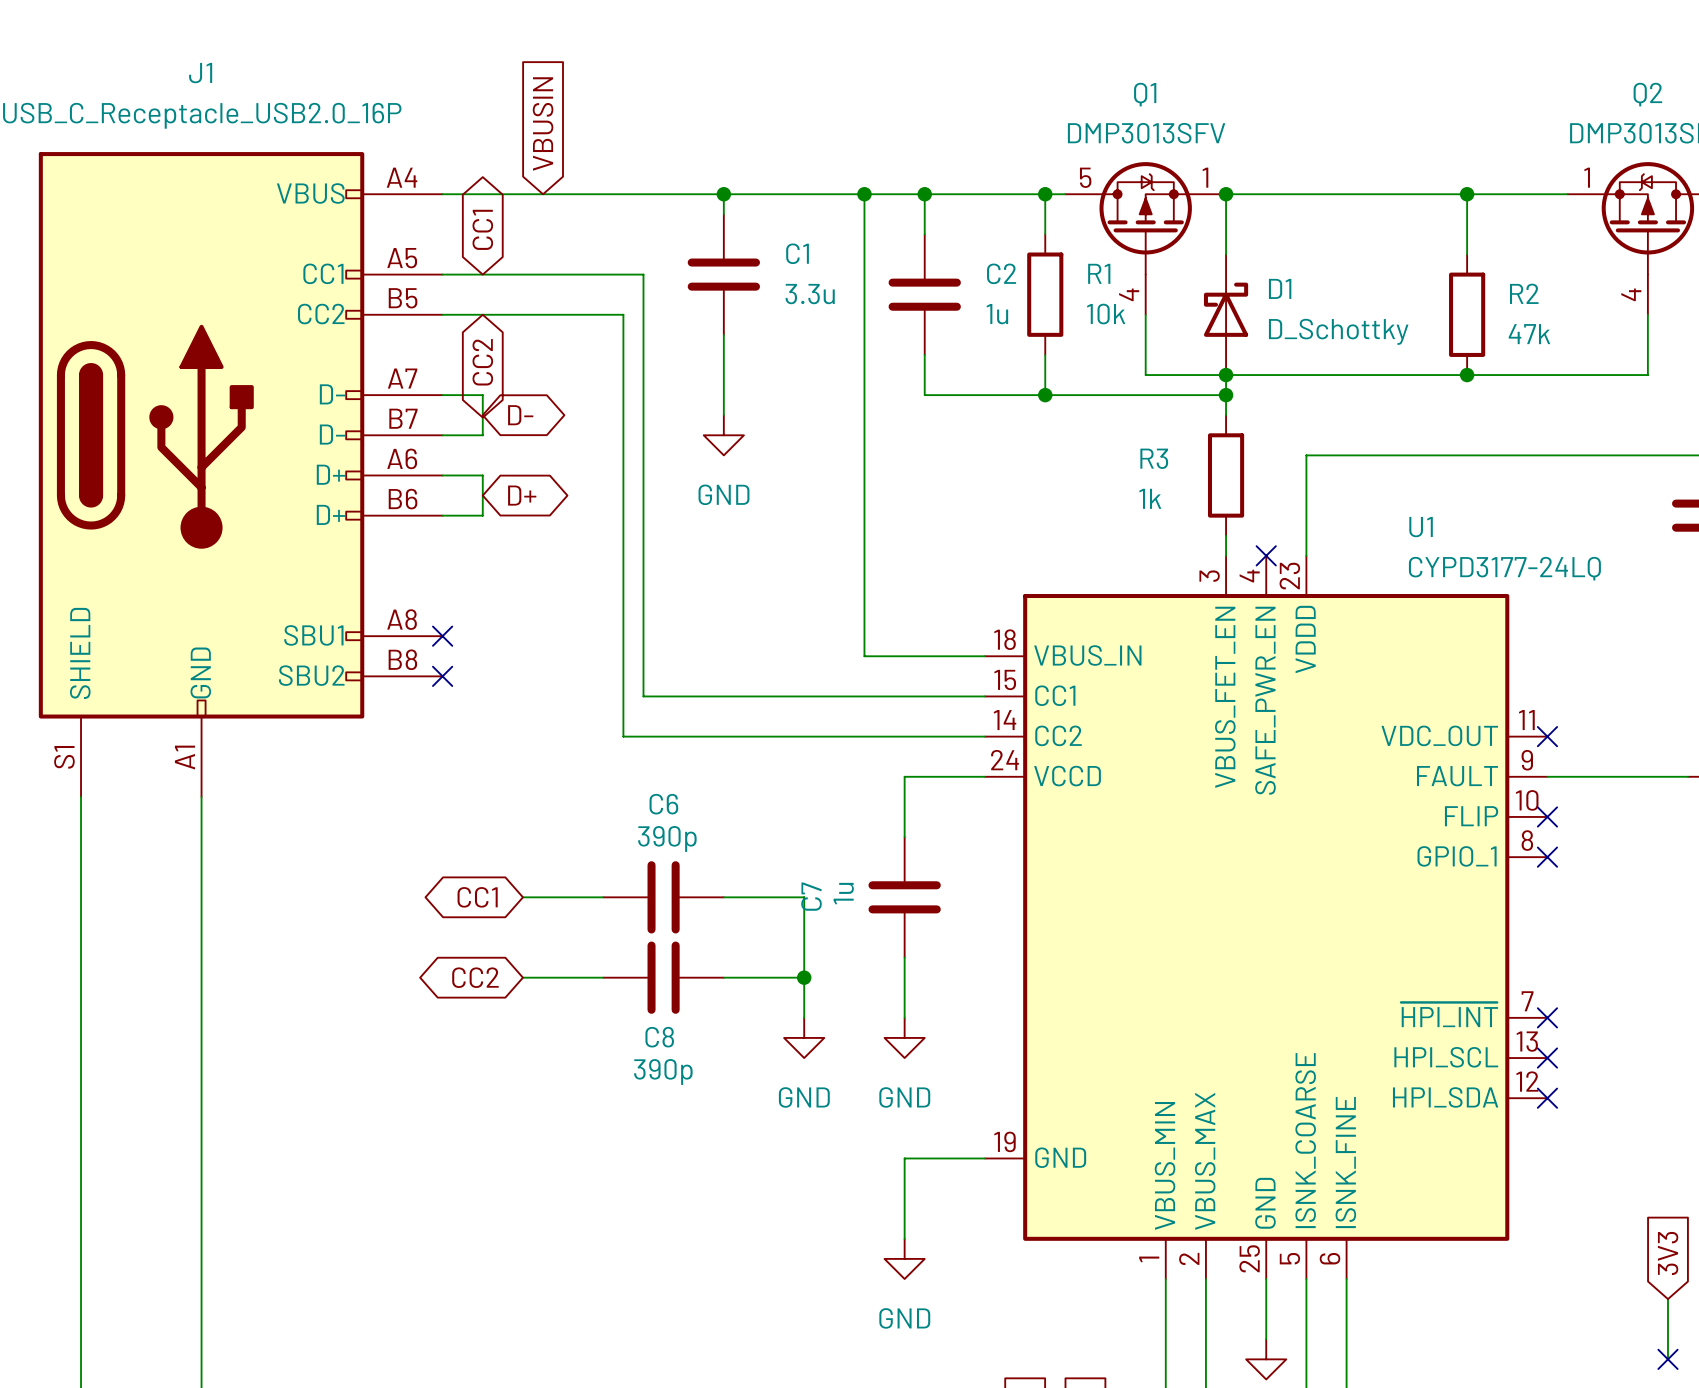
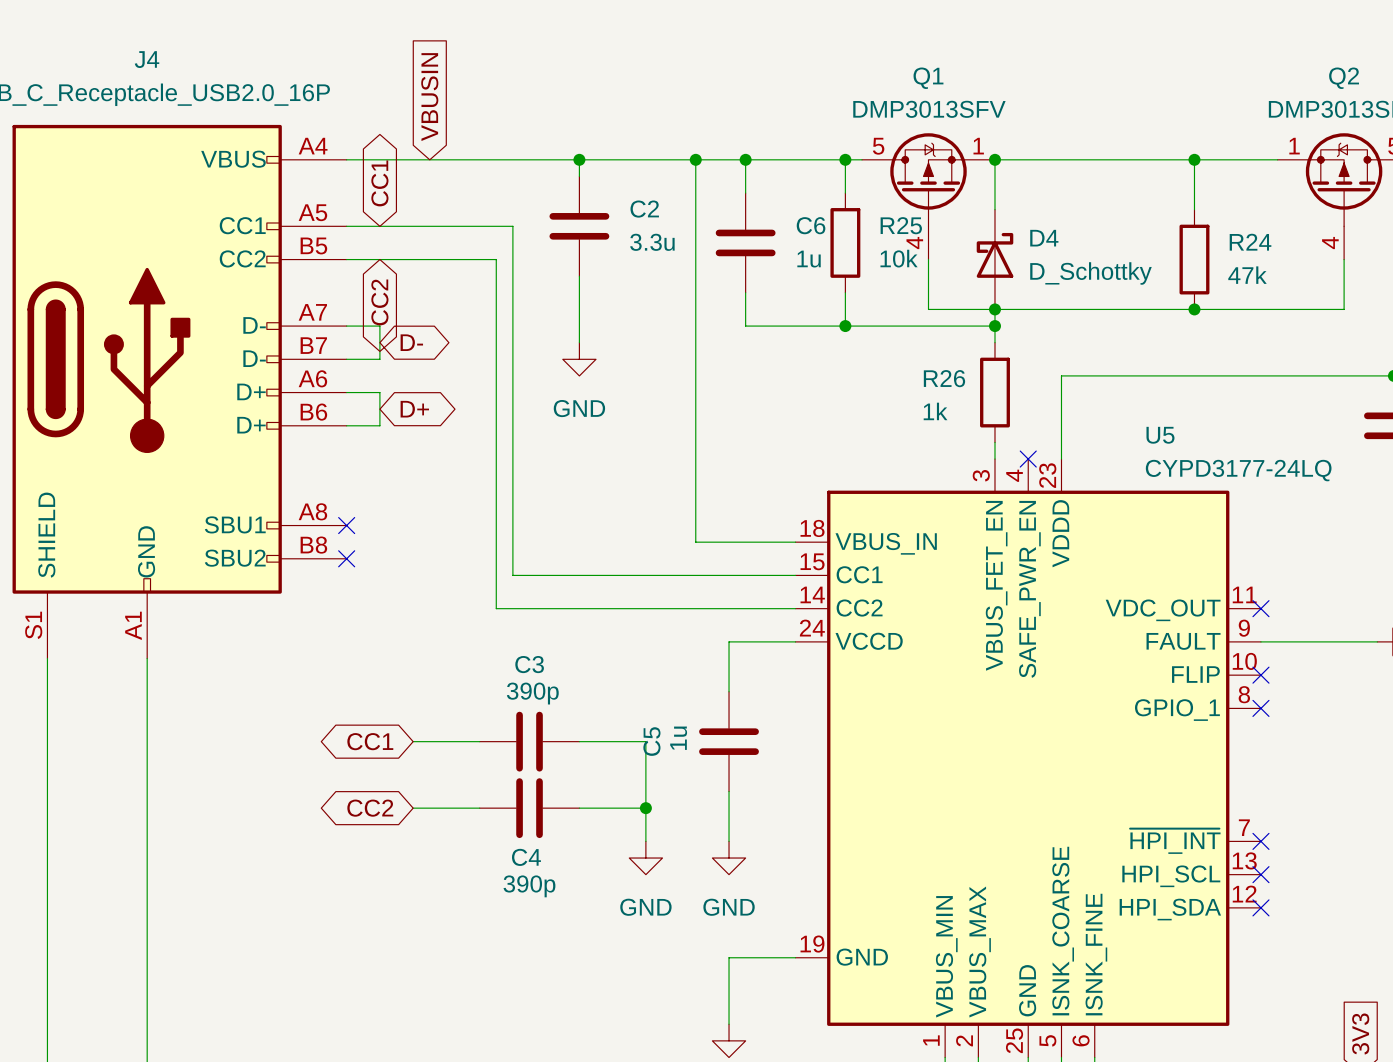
J1 name: J1 (200, 73) -> J4 (147, 59)
C1 name: C1 (797, 253) -> C2 (644, 209)
C2 name: C2 (1001, 273) -> C6 (811, 225)
R1 name: R1 (1099, 273) -> R25 (901, 225)
D1 name: D1 (1280, 288) -> D4 (1044, 238)
R2 name: R2 (1524, 293) -> R24 (1250, 242)
R3 name: R3 (1154, 458) -> R26 (944, 378)
U1 name: U1 (1421, 527) -> U5 (1160, 435)
C6 name: C6 (663, 804) -> C3 (529, 664)
C7 name: C7 (811, 896) -> C5 (651, 741)
C8 name: C8 (659, 1037) -> C4 (526, 857)

